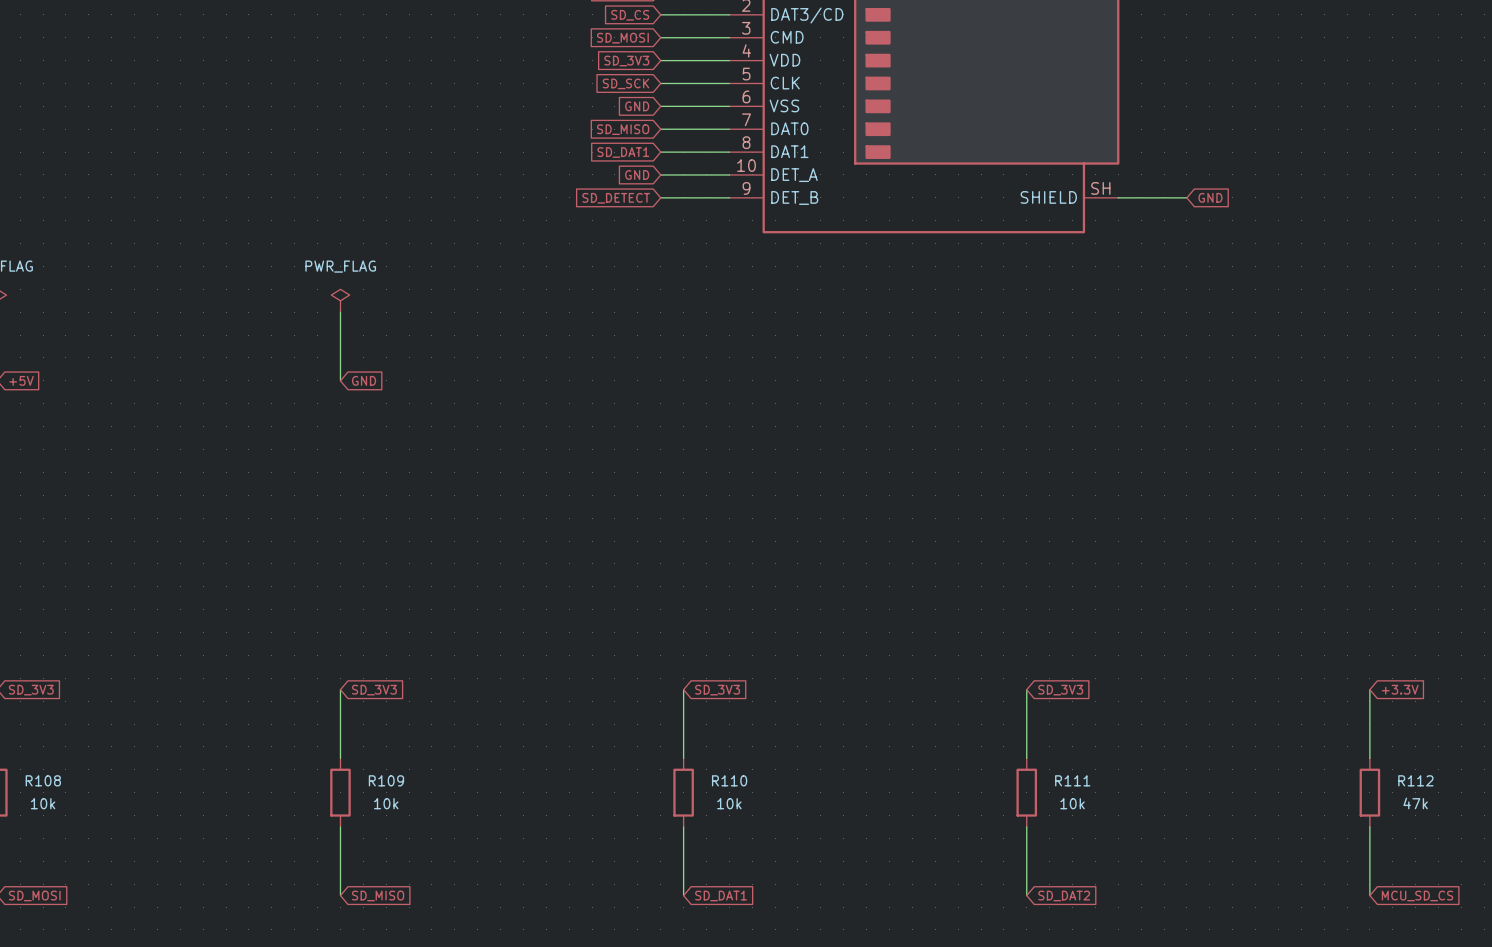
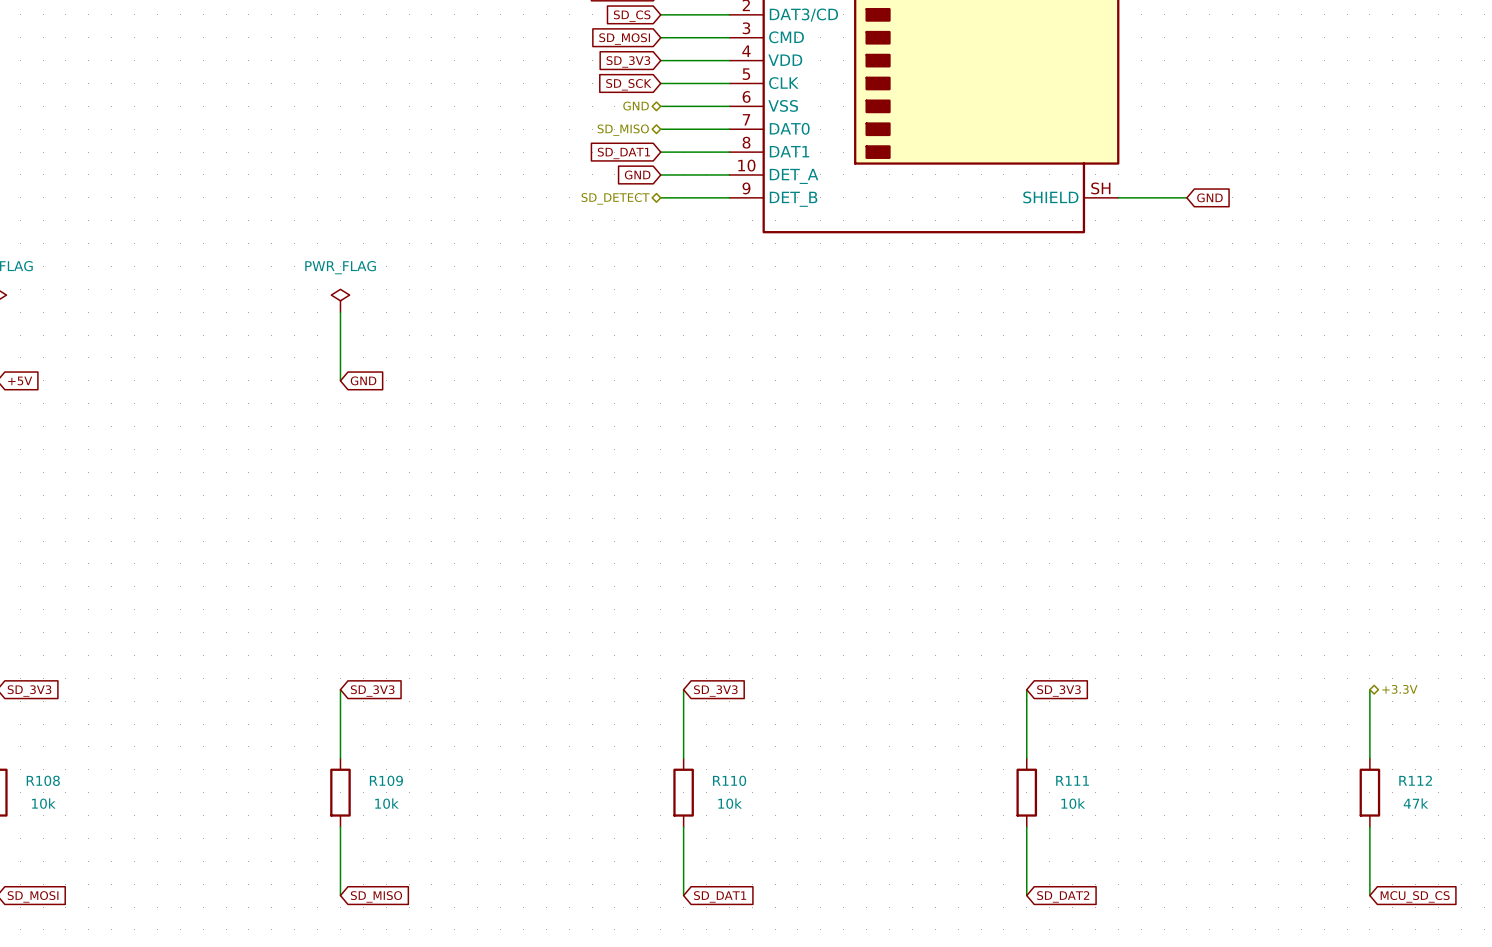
hierarchical label: none -> GND (636, 106)
global label: GND (637, 106) -> none
hierarchical label: none -> SD_MISO (623, 130)
global label: SD_MISO (623, 129) -> none
hierarchical label: none -> SD_DETECT (615, 198)
global label: SD_DETECT (616, 198) -> none
global label: +3.3V (1400, 689) -> none
hierarchical label: none -> +3.3V (1399, 689)

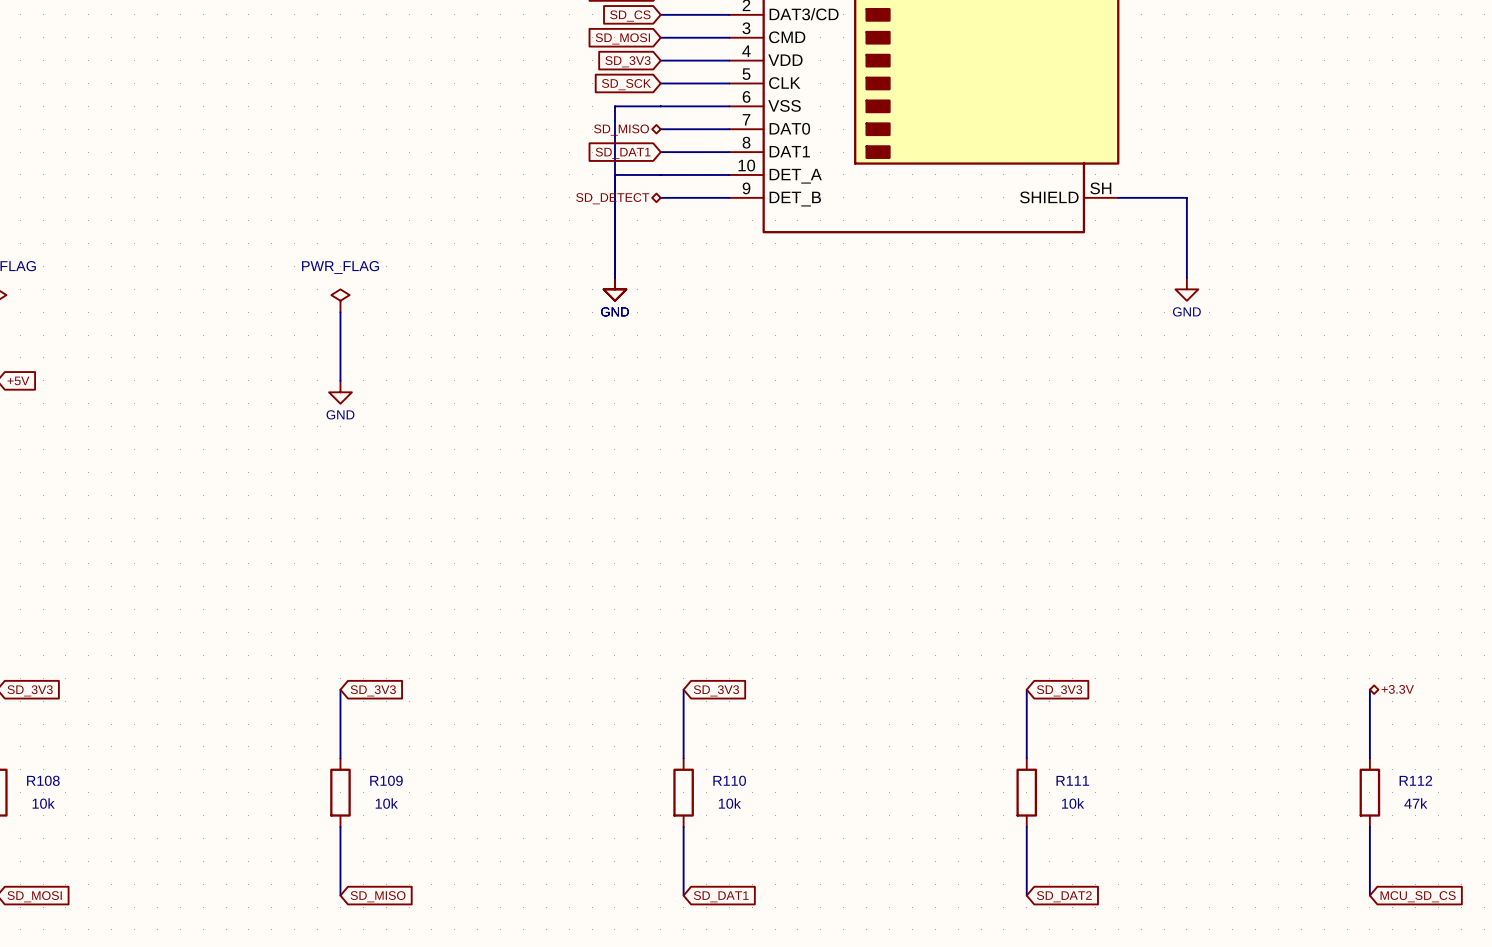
hierarchical label: GND (636, 106) -> none
wire: none -> (660, 106) (614, 106) (614, 277)
wire: none -> (614, 174) (660, 174)
global label: GND (637, 174) -> none
wire: none -> (1186, 197) (1186, 277)
global label: GND (1209, 197) -> none
power symbol: none -> GND (614, 289)
power symbol: none -> GND (1186, 289)
global label: GND (363, 380) -> none
power symbol: none -> GND (340, 392)

